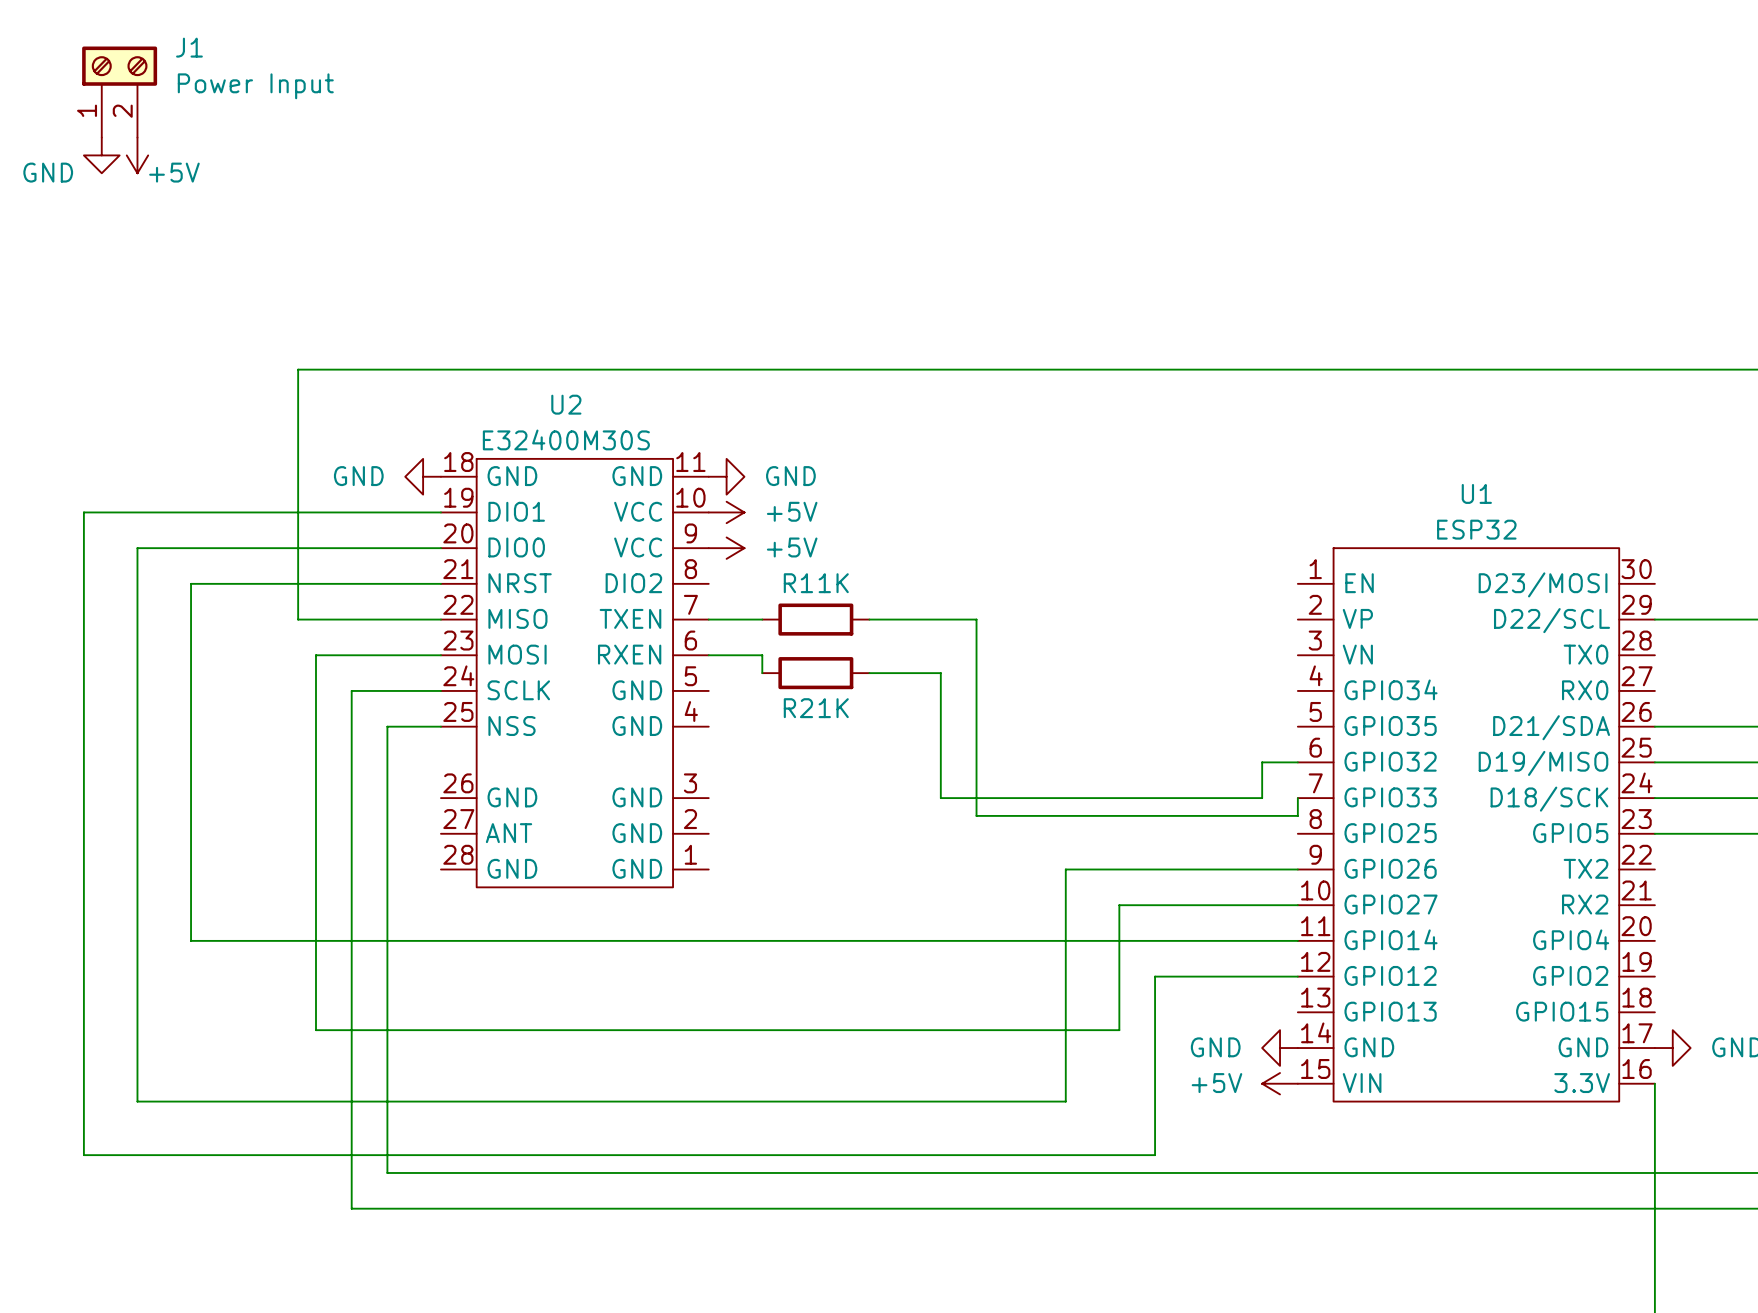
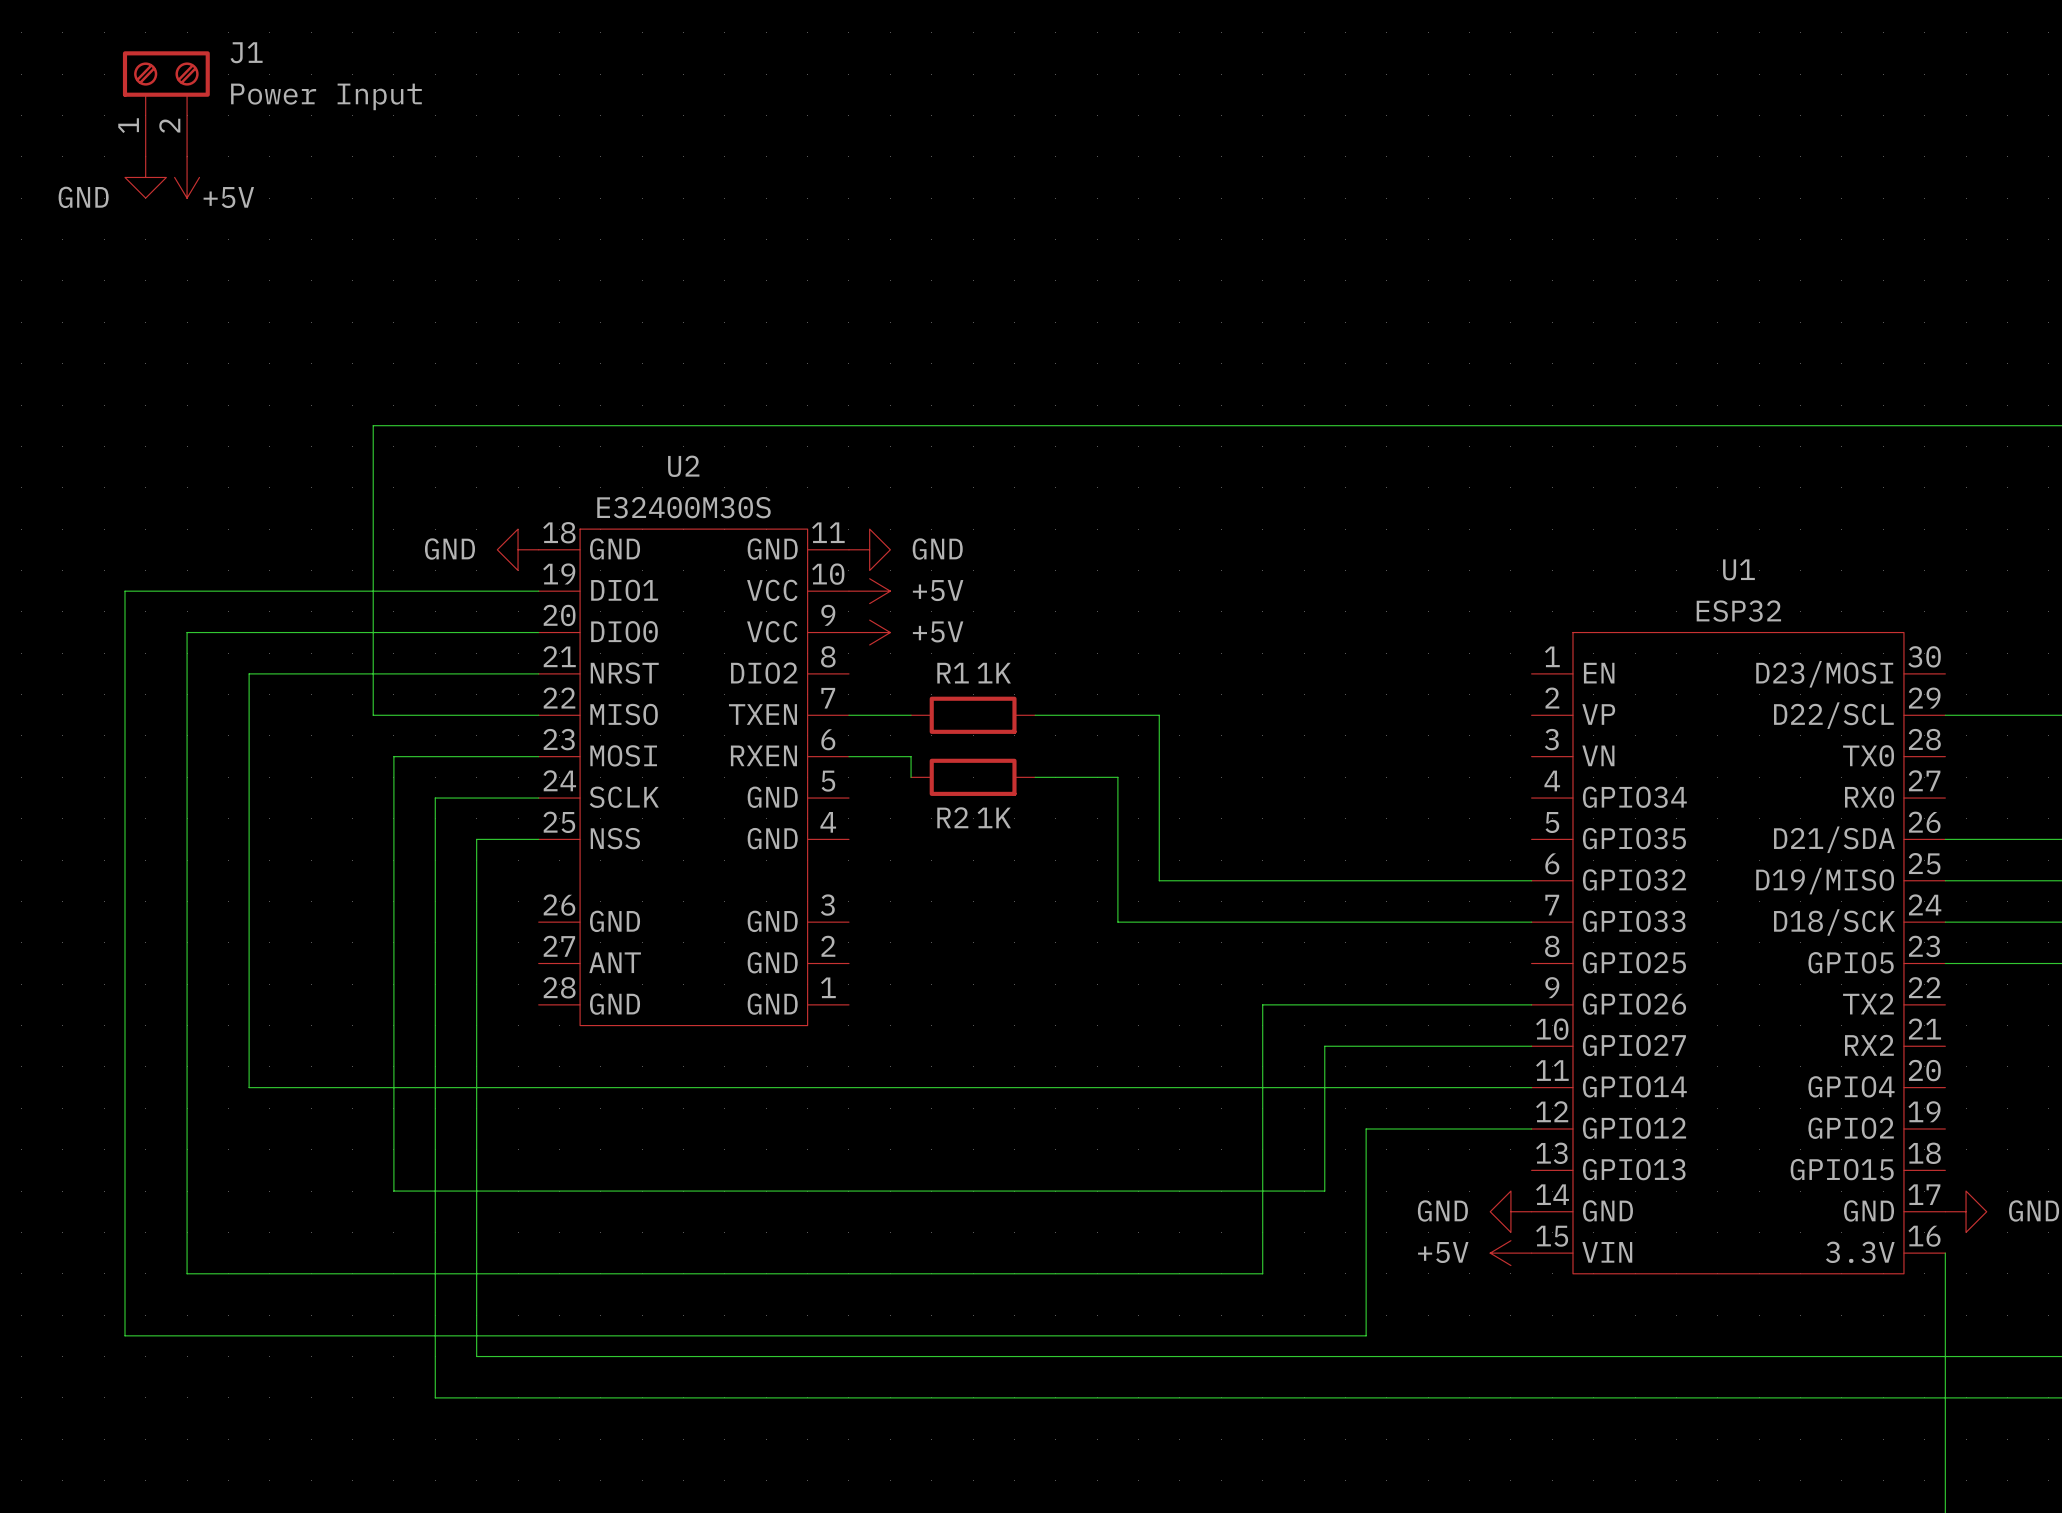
wire: (976, 762) (976, 815) (1297, 815) (1297, 798) -> (1159, 880) (1490, 880)
wire: (1262, 762) (1262, 798) -> (1531, 922) (1490, 922)

